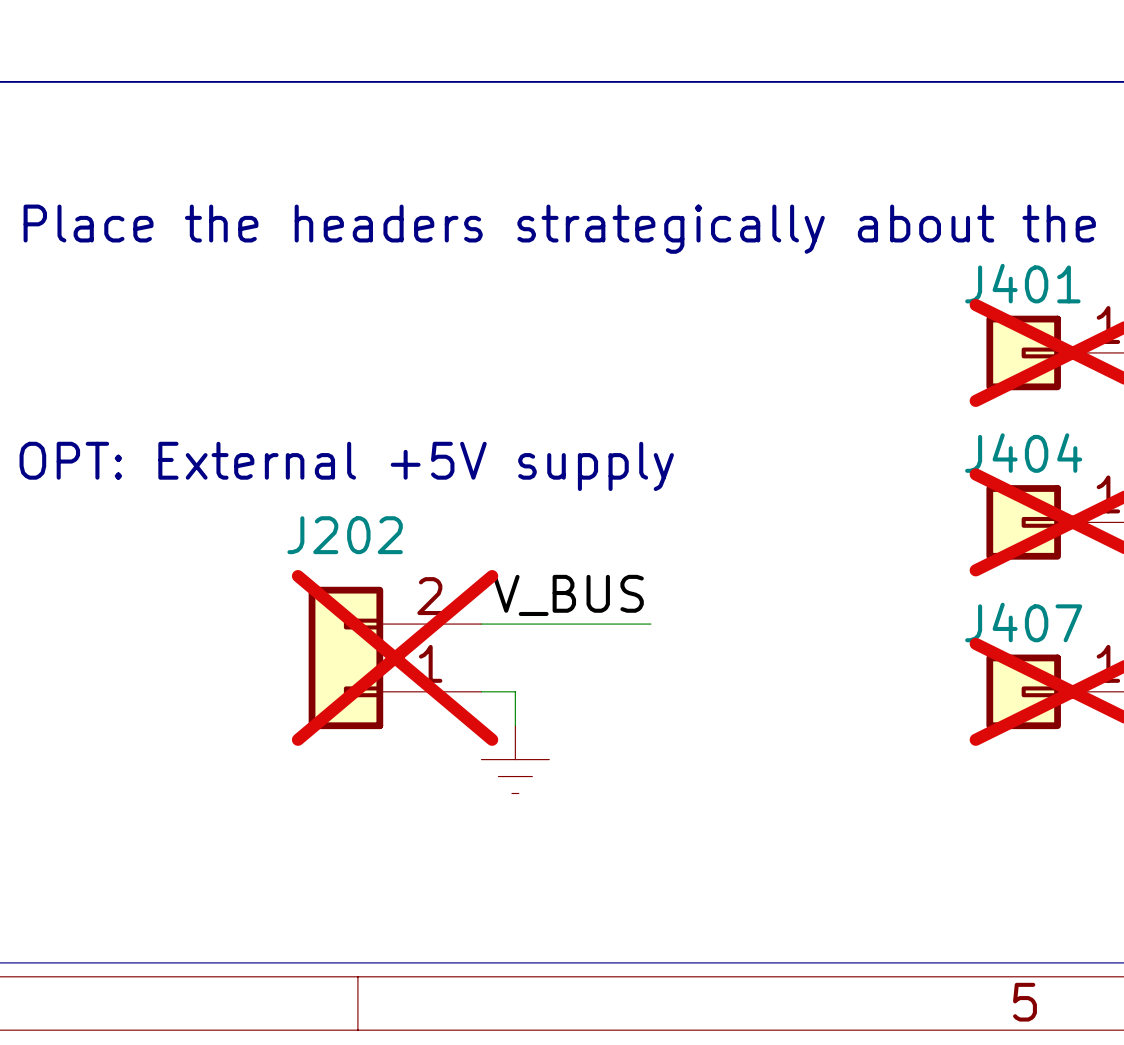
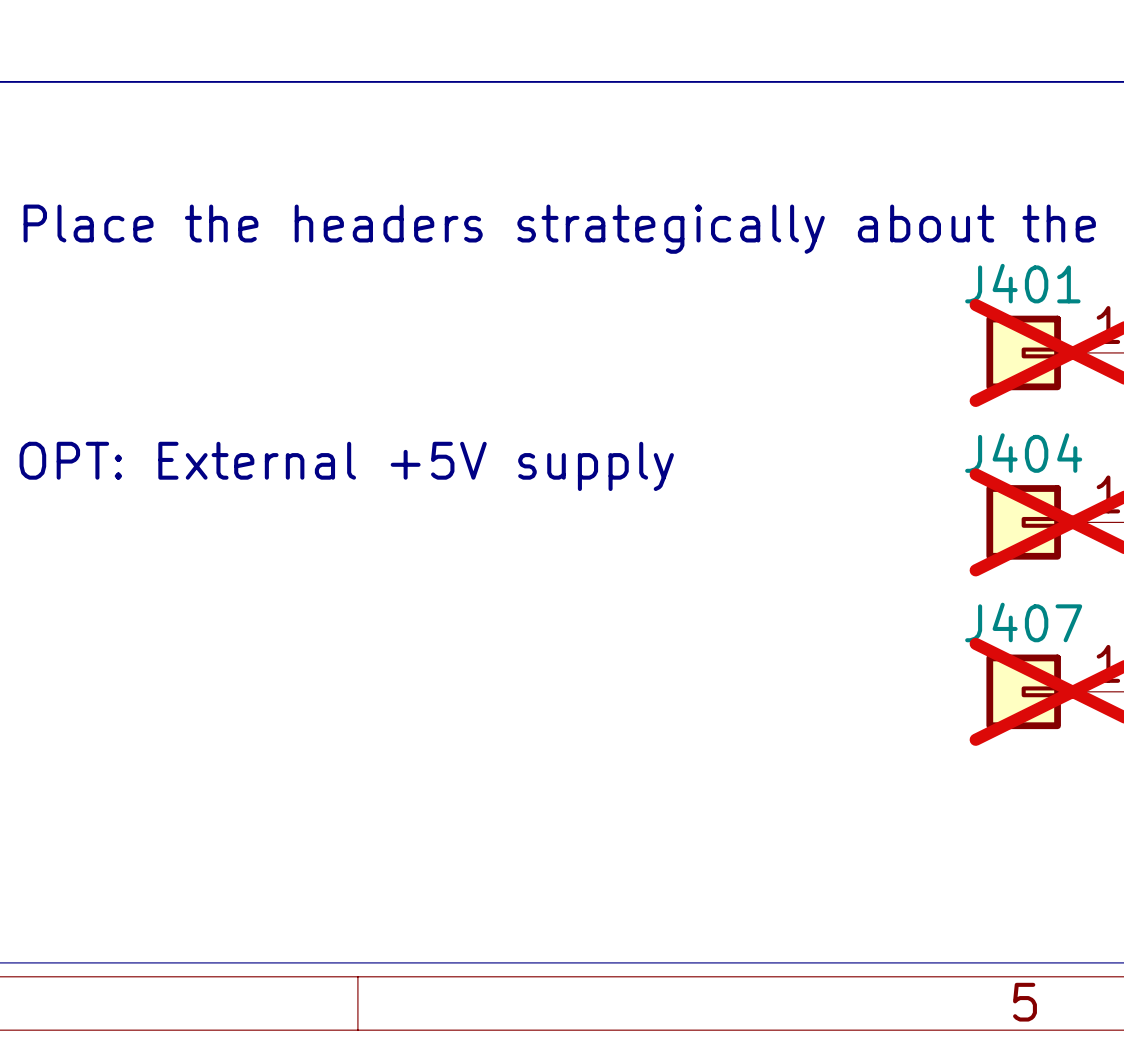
label: V_BUS (568, 595) -> none
wire: (481, 624) (650, 624) -> none
J202: (395, 657) -> none
wire: (481, 691) (515, 691) (515, 725) -> none
power symbol: (515, 759) -> none

